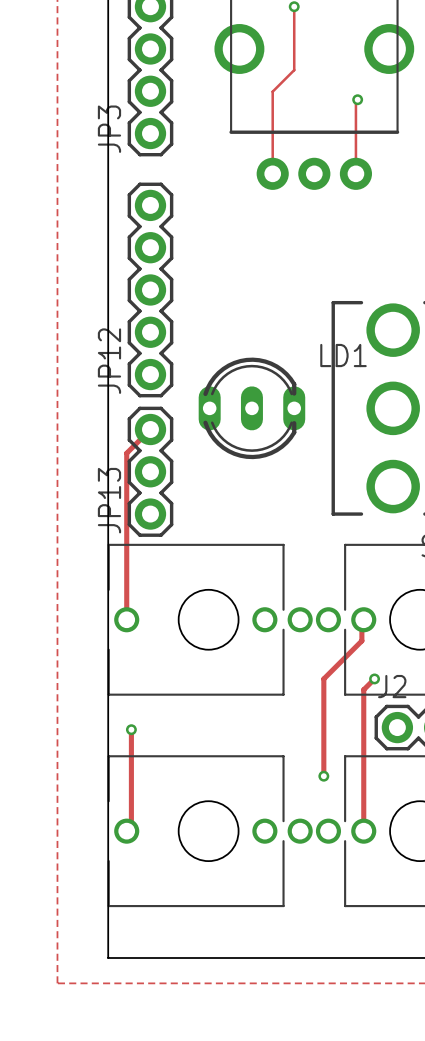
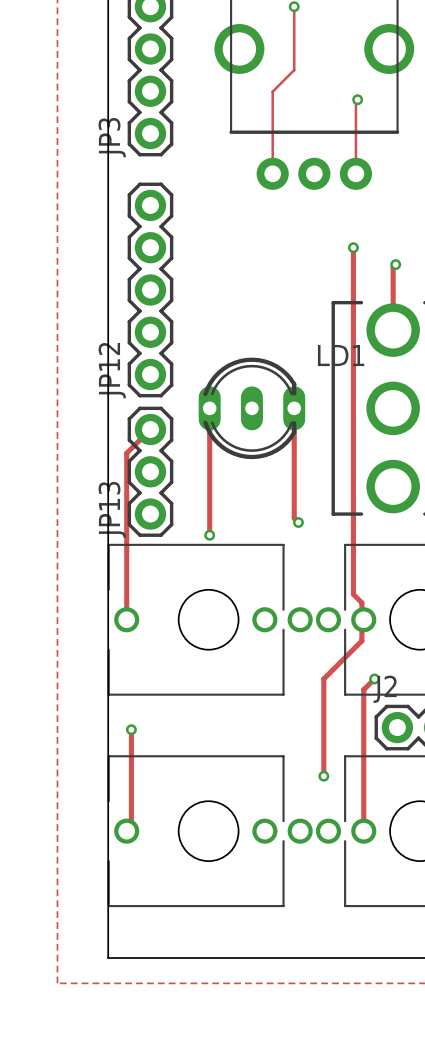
track: none -> (353, 247) (353, 594) (361, 602) (361, 621)
via: none -> (353, 247)
track: none -> (395, 264) (393, 267) (393, 330)
via: none -> (395, 264)
track: none -> (209, 408) (209, 535)
track: none -> (294, 408) (294, 518) (298, 522)
via: none -> (298, 522)
via: none -> (209, 535)

